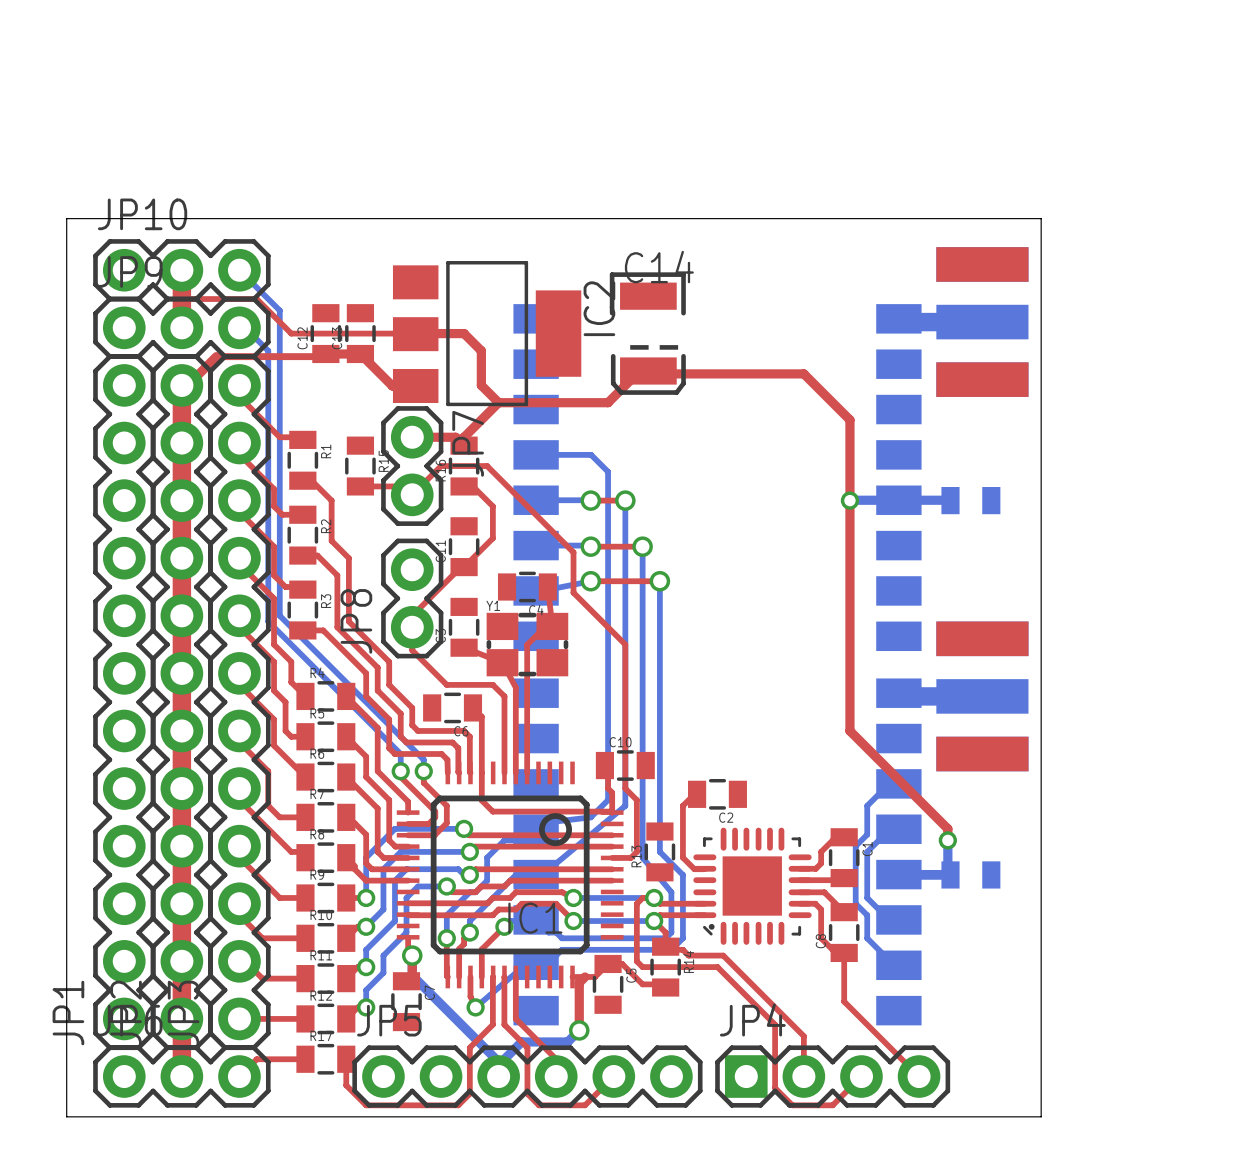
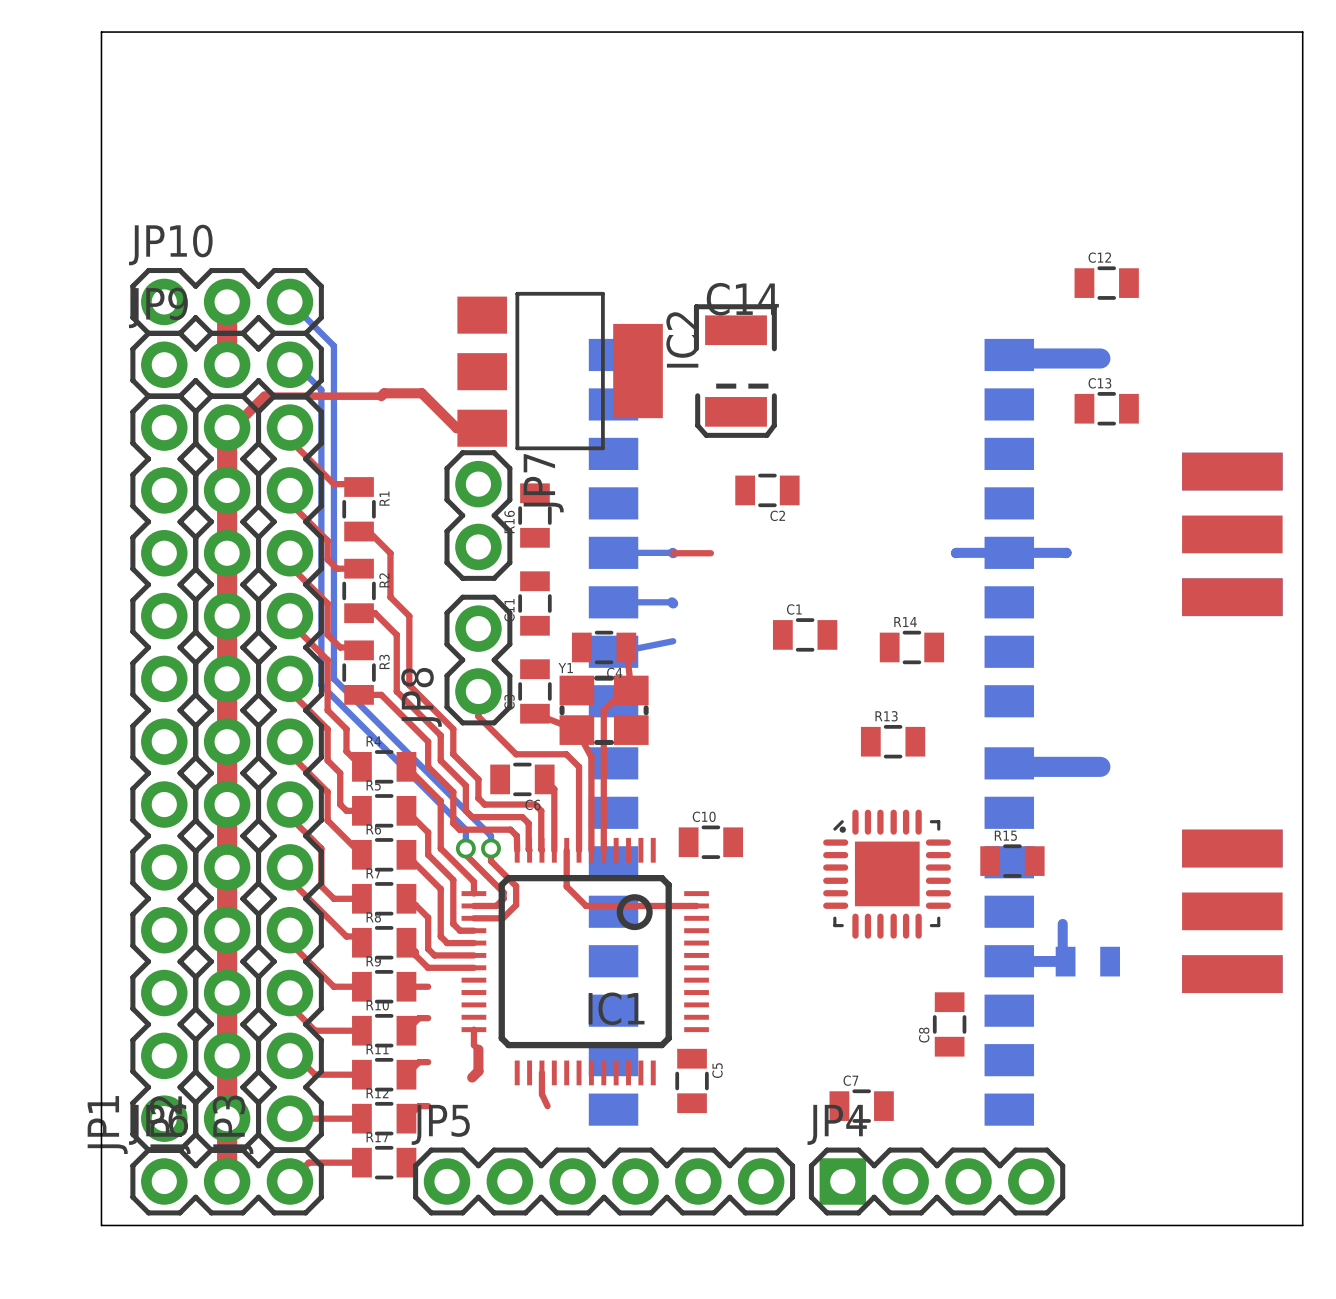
board edge: (66, 218) (1041, 218) (1041, 1116) -> (101, 245) (101, 32) (1302, 32) (1302, 1225) (1164, 1225)
top track: (181, 299) (256, 299) (291, 333) (464, 333) (481, 350) (481, 385) (498, 402) -> none
part side: bottom (982, 322) -> top (1232, 534)
C12 rotation: 0° (325, 333) -> 90° clockwise (1106, 283)
C12 position: (325, 333) -> (1106, 283)
C13 rotation: 0° (360, 333) -> 90° clockwise (1106, 408)
C13 position: (360, 333) -> (1106, 408)
top track: (498, 402) (608, 402) (639, 371) (648, 371) (651, 373) (803, 373) (849, 419) (849, 730) (947, 828) (947, 840) -> none
top track: (498, 402) (464, 437) (464, 445) (455, 437) (412, 437) -> none
bottom track: (536, 454) (591, 454) (608, 471) (608, 800) (590, 817) (542, 823) (536, 829) (527, 829) (515, 840) (504, 840) (487, 857) (487, 880) (475, 892) (469, 892) (446, 915) (446, 938) -> none
R15 rotation: 0° (360, 466) -> 90° clockwise (1012, 861)
R15 position: (360, 466) -> (1012, 861)
top track: (360, 486) (404, 486) (410, 489) (412, 494) (441, 466) (487, 466) (573, 552) (573, 592) (625, 644) (625, 788) (636, 800) (636, 851) (630, 857) (612, 857) -> none
top track: (464, 486) (472, 486) (492, 506) (492, 538) (418, 610) (418, 621) (412, 627) -> none
via: (590, 500) -> none
bottom track: (625, 500) (625, 805) (556, 863) (536, 874) (515, 874) (469, 921) (469, 932) -> none
via: (625, 500) -> none
via: (849, 500) -> none
part: (970, 500) -> none
top track: (590, 546) (642, 546) -> none
via: (590, 546) -> none
bottom track: (642, 546) (642, 857) (671, 892) (671, 932) (665, 938) (561, 938) (556, 932) (548, 932) (536, 919) (510, 921) (504, 926) -> none
via: (642, 546) -> none
top track: (590, 581) (659, 581) -> none
via: (590, 581) -> none
bottom track: (659, 581) (659, 851) (682, 874) (682, 938) (671, 949) (561, 949) (556, 955) (545, 955) (528, 972) (515, 972) (475, 1007) -> none
via: (659, 581) -> none
part side: bottom (982, 696) -> top (1232, 911)
top track: (604, 765) (608, 768) (608, 788) (612, 792) (612, 812) (492, 811) (481, 800) (481, 772) -> none
top track: none -> (566, 850) (566, 886) (586, 905) (696, 905)
bottom track: (898, 783) (889, 783) (867, 805) (867, 834) (855, 846) (855, 903) (867, 915) (867, 938) (884, 955) (889, 955) (898, 965) -> none
top track: (697, 794) (694, 794) (682, 805) (682, 857) (694, 869) (704, 868) -> none
C2 position: (717, 794) -> (767, 490)
top track: (464, 828) (469, 835) (612, 835) -> none
bottom track: (464, 828) (394, 828) (366, 857) (366, 897) -> none
via: (464, 828) -> none
bottom track: (898, 829) (889, 829) (867, 851) (867, 897) (884, 915) (894, 915) (898, 919) -> none
top track: (844, 837) (841, 840) (832, 840) (821, 851) (821, 863) (815, 868) (800, 868) -> none
via: (947, 840) -> none
top track: (612, 846) (475, 846) (469, 851) -> none
bottom track: (469, 851) (400, 851) (383, 869) (383, 909) (366, 926) -> none
via: (469, 851) -> none
R13 rotation: 0° (659, 851) -> 90° clockwise (893, 741)
R13 position: (659, 851) -> (893, 741)
C1 rotation: 0° (844, 857) -> 90° clockwise (805, 634)
C1 position: (844, 857) -> (805, 634)
top track: (612, 869) (475, 869) (469, 874) -> none
bottom track: (469, 874) (464, 874) (458, 869) (406, 869) (394, 880) (394, 921) (366, 949) (366, 967) -> none
via: (469, 874) -> none
top track: (844, 878) (839, 880) (800, 880) -> none
top track: (612, 880) (510, 880) (504, 886) (481, 886) (475, 892) (452, 892) (446, 886) -> none
bottom track: (446, 886) (418, 886) (406, 897) (406, 932) (383, 955) (383, 972) (366, 990) (366, 1007) -> none
via: (446, 886) -> none
part rotation: 0° (752, 886) -> 90° clockwise (887, 874)
part position: (752, 886) -> (887, 874)
top track: (800, 892) (824, 892) (844, 912) -> none
via: (366, 897) -> none
top track: (573, 897) (561, 892) (515, 892) (510, 897) (492, 897) (487, 903) (408, 903) -> none
bottom track: (573, 897) (654, 897) -> none
via: (573, 897) -> none
via: (654, 897) -> none
top track: (704, 903) (659, 903) (654, 897) (642, 897) (636, 903) (636, 961) (642, 967) (717, 967) (775, 1024) (775, 1088) (792, 1105) (832, 1105) (861, 1076) -> none
top track: (800, 903) (815, 903) (821, 909) (821, 938) (832, 949) (841, 949) (844, 952) (844, 1001) (919, 1076) -> none
top track: (408, 914) (492, 915) (498, 909) (515, 909) (521, 903) (556, 903) (573, 921) -> none
top track: (704, 915) (659, 915) (654, 921) (665, 932) (665, 946) (668, 949) (682, 949) (688, 955) (723, 955) (803, 1036) (803, 1076) -> none
bottom track: (573, 921) (654, 921) -> none
via: (573, 921) -> none
via: (654, 921) -> none
via: (366, 926) -> none
top track: (504, 926) (481, 949) (481, 976) -> none
via: (504, 926) -> none
top track: (469, 932) (464, 938) (464, 944) (459, 949) (459, 976) -> none
via: (469, 932) -> none
top track: (446, 938) (447, 976) -> none
via: (446, 938) -> none
bottom track: (412, 955) (412, 975) (498, 1061) (498, 1076) -> none
via: (412, 955) -> none
via: (366, 967) -> none
R14 rotation: 0° (665, 967) -> 90° clockwise (911, 647)
R14 position: (665, 967) -> (911, 647)
top track: (515, 976) (515, 1018) (556, 1059) (556, 1076) -> none
top track: (572, 976) (595, 976) (608, 963) (622, 963) (642, 984) (662, 984) (665, 987) -> none
top track: (585, 976) (579, 982) (579, 1030) -> none
top track: (492, 977) (492, 1024) (469, 1047) (469, 1093) (458, 1105) (366, 1105) (346, 1085) (346, 1059) -> none
top track: (504, 977) (504, 1024) (527, 1047) (527, 1093) (538, 1105) (585, 1105) (613, 1076) -> none
C7 rotation: 0° (406, 1001) -> 90° clockwise (861, 1106)
C7 position: (406, 1001) -> (861, 1106)
via: (366, 1007) -> none
via: (475, 1007) -> none
bottom track: (579, 1030) (567, 1041) (521, 1041) (498, 1065) -> none
via: (579, 1030) -> none

